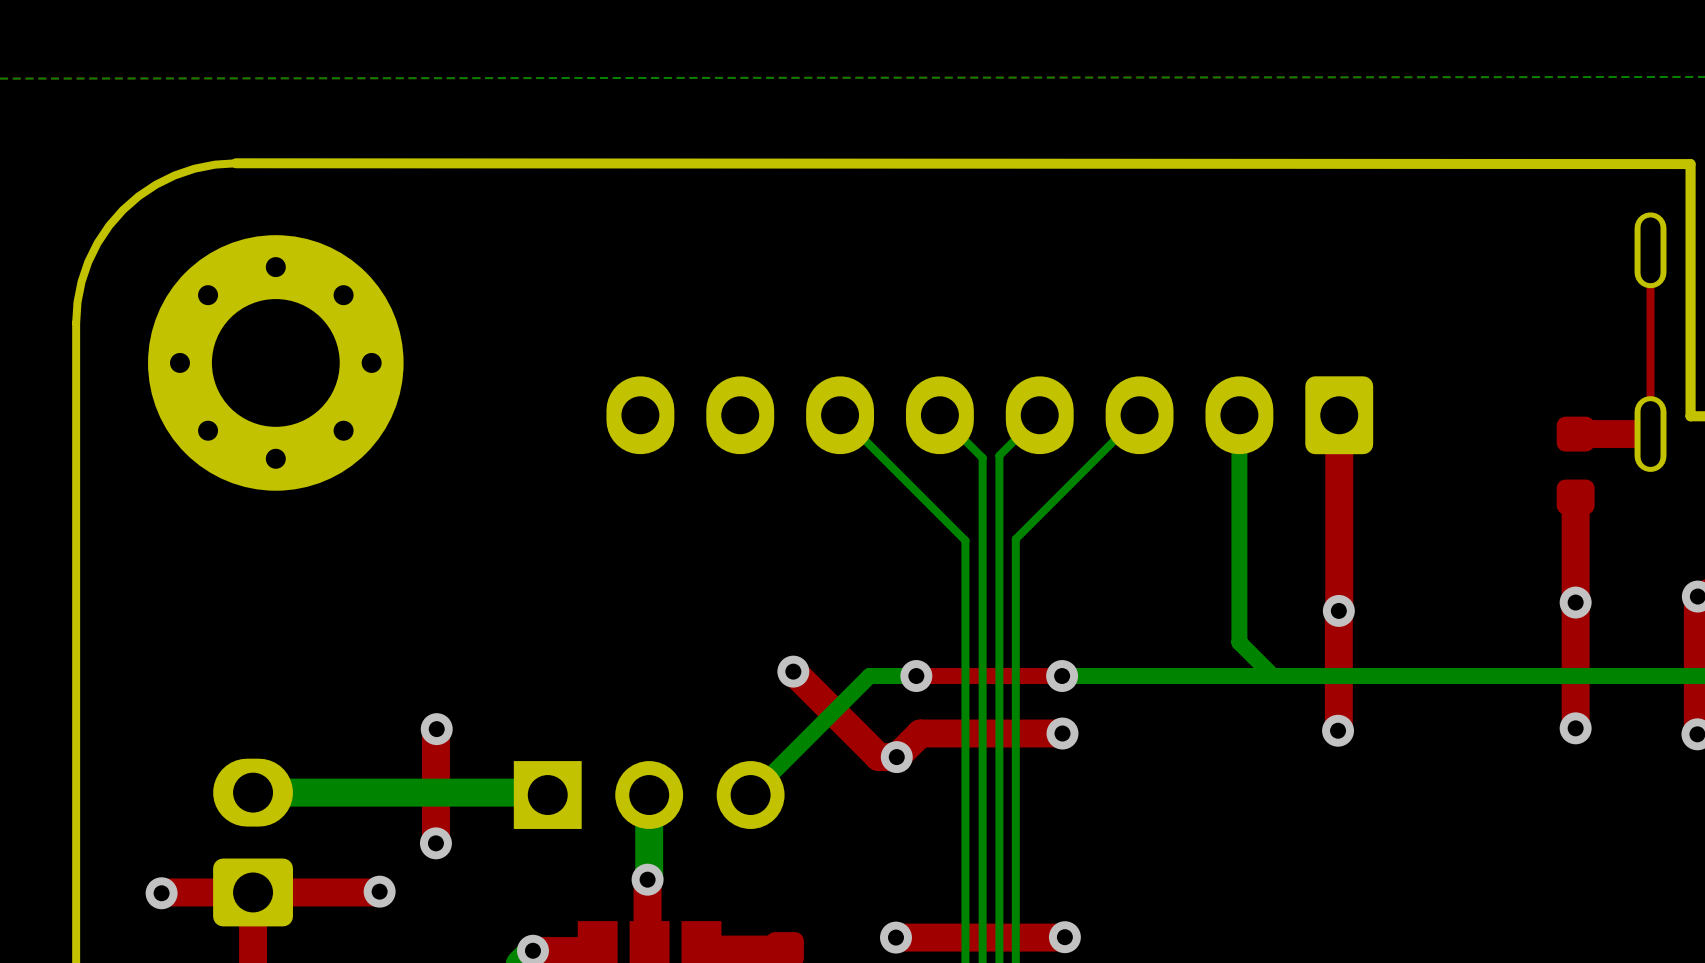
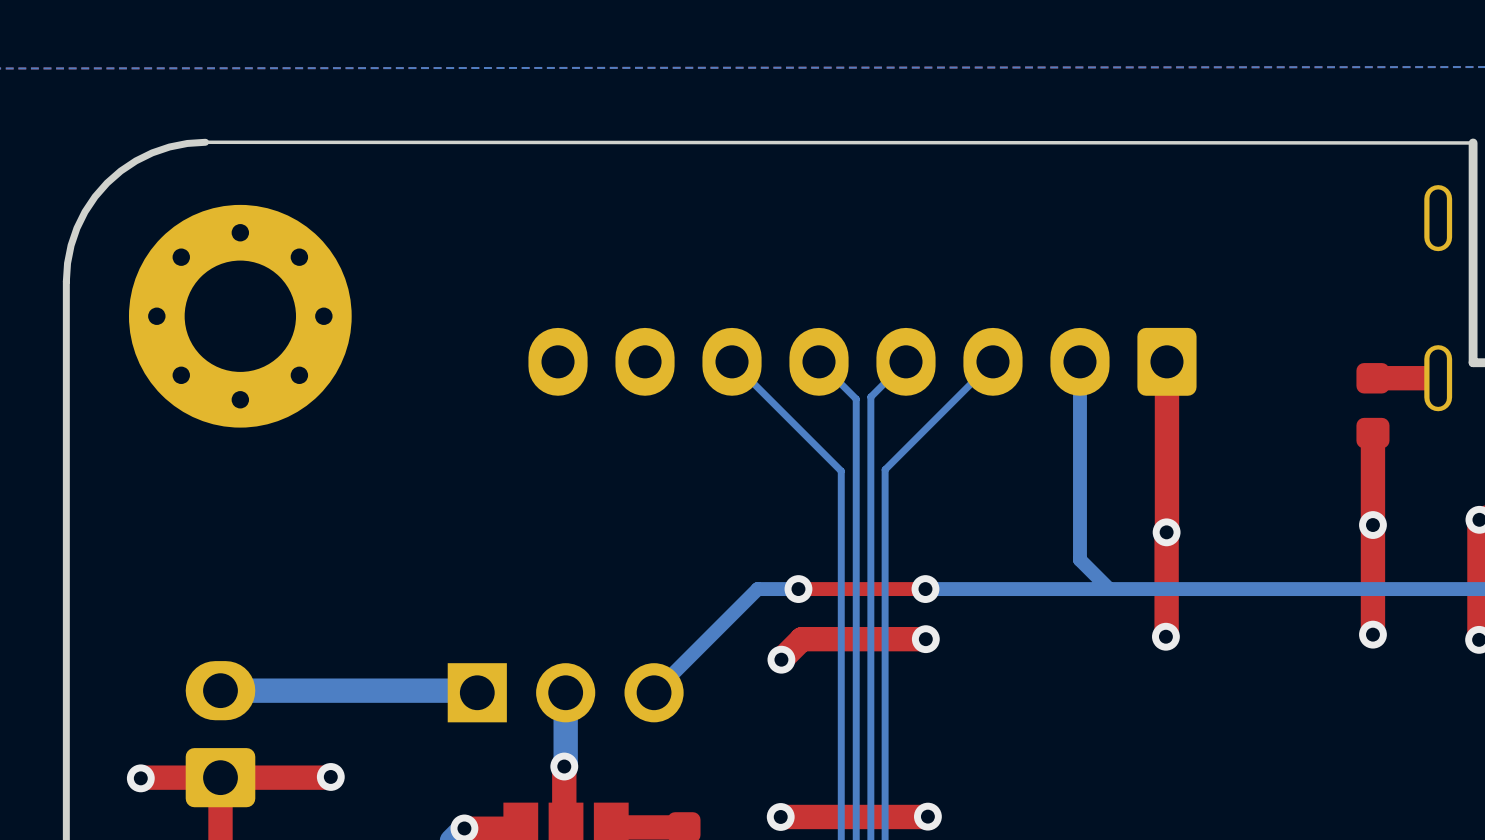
board edge width: thick (235, 163) (1690, 164) -> thin (205, 142) (1473, 142)
top track: (1650, 250) (1650, 434) -> none
top track: (793, 671) (878, 757) (896, 757) -> none
via: (793, 671) -> none
top track: (436, 729) (435, 843) -> none
via: (436, 729) -> none
via: (435, 843) -> none

